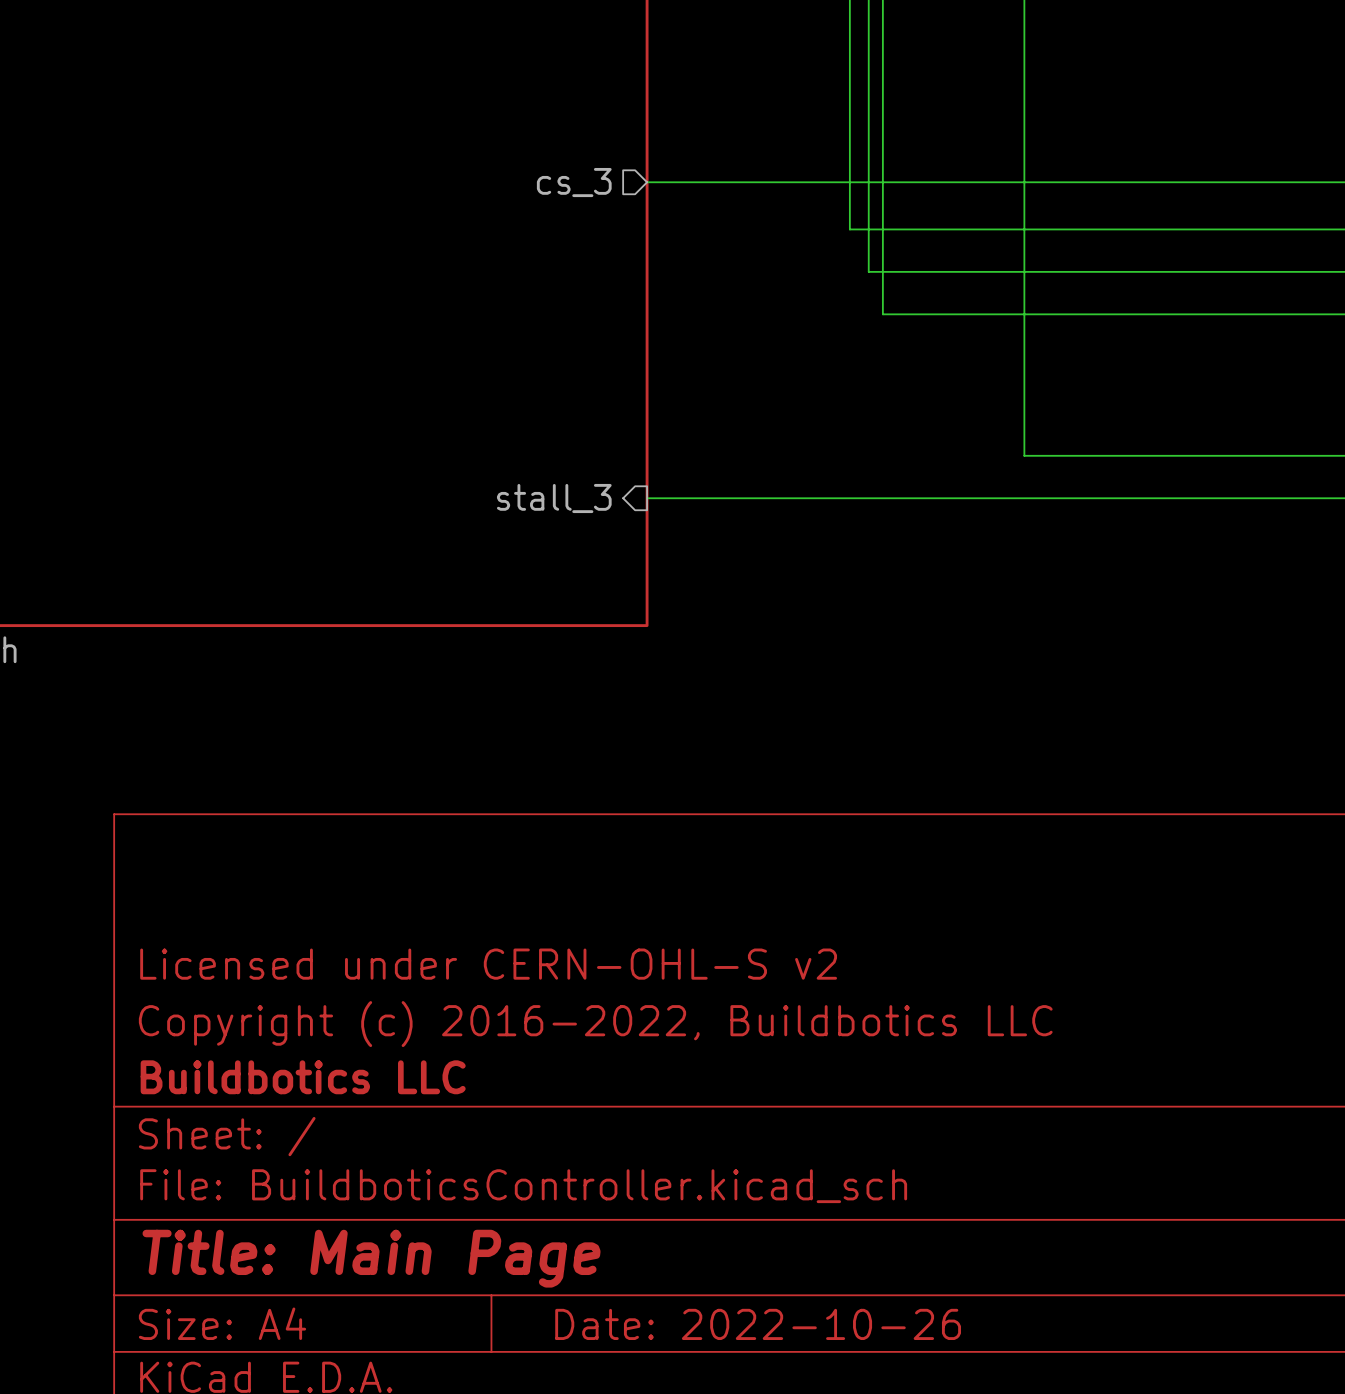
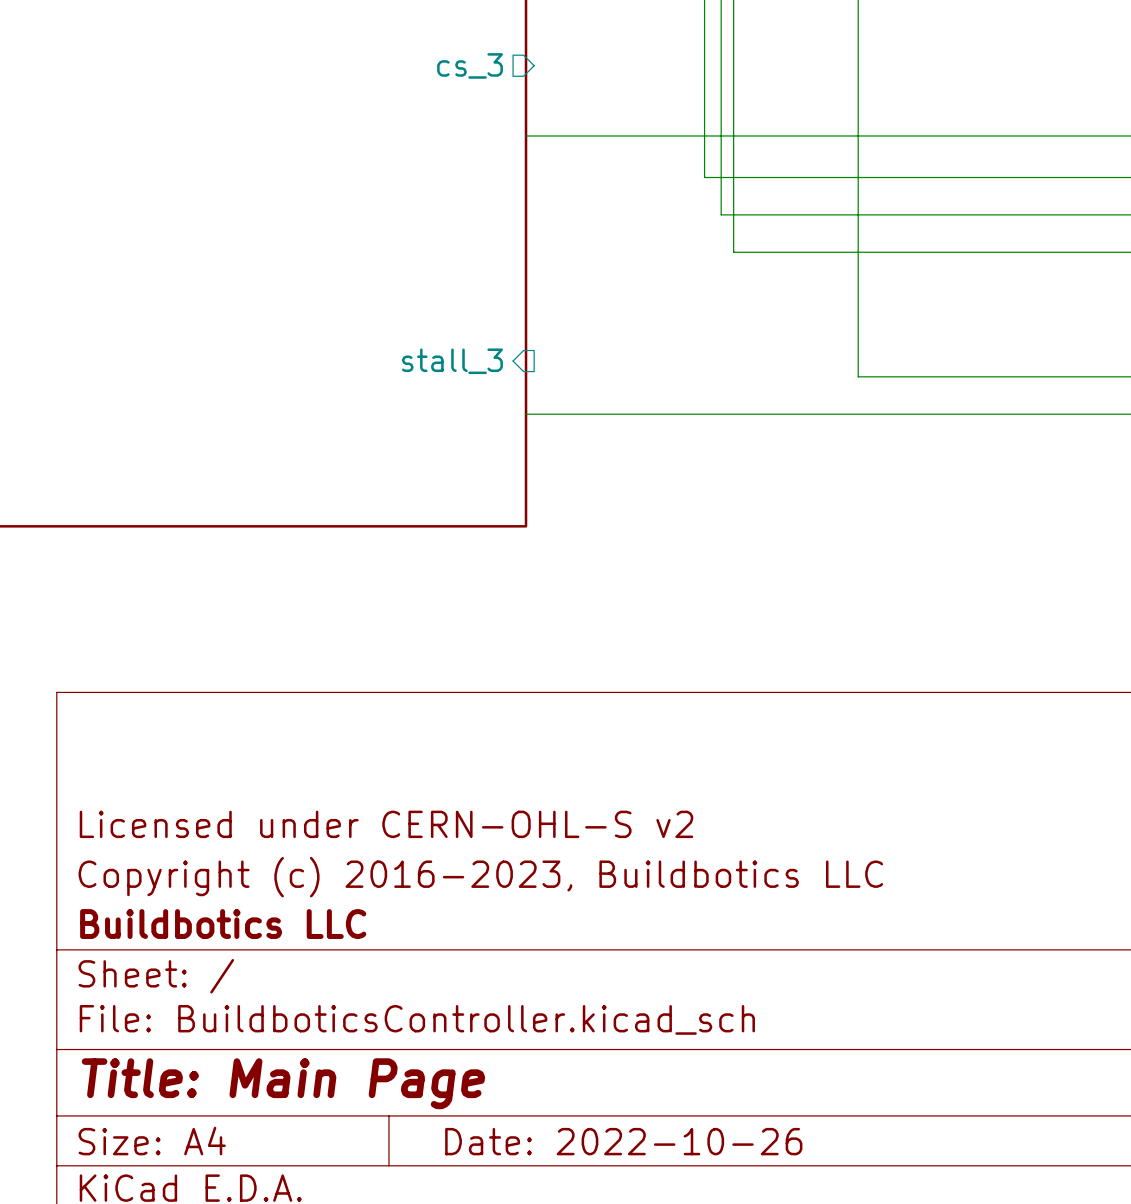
sheet pin position: cs_3 (574, 182) -> cs_3 (470, 65)
sheet pin position: stall_3 (554, 498) -> stall_3 (452, 361)
title block: Copyright (c) 2016-2022, Buildbotics LLC (595, 1024) -> Copyright (c) 2016-2023, Buildbotics LLC (480, 877)

